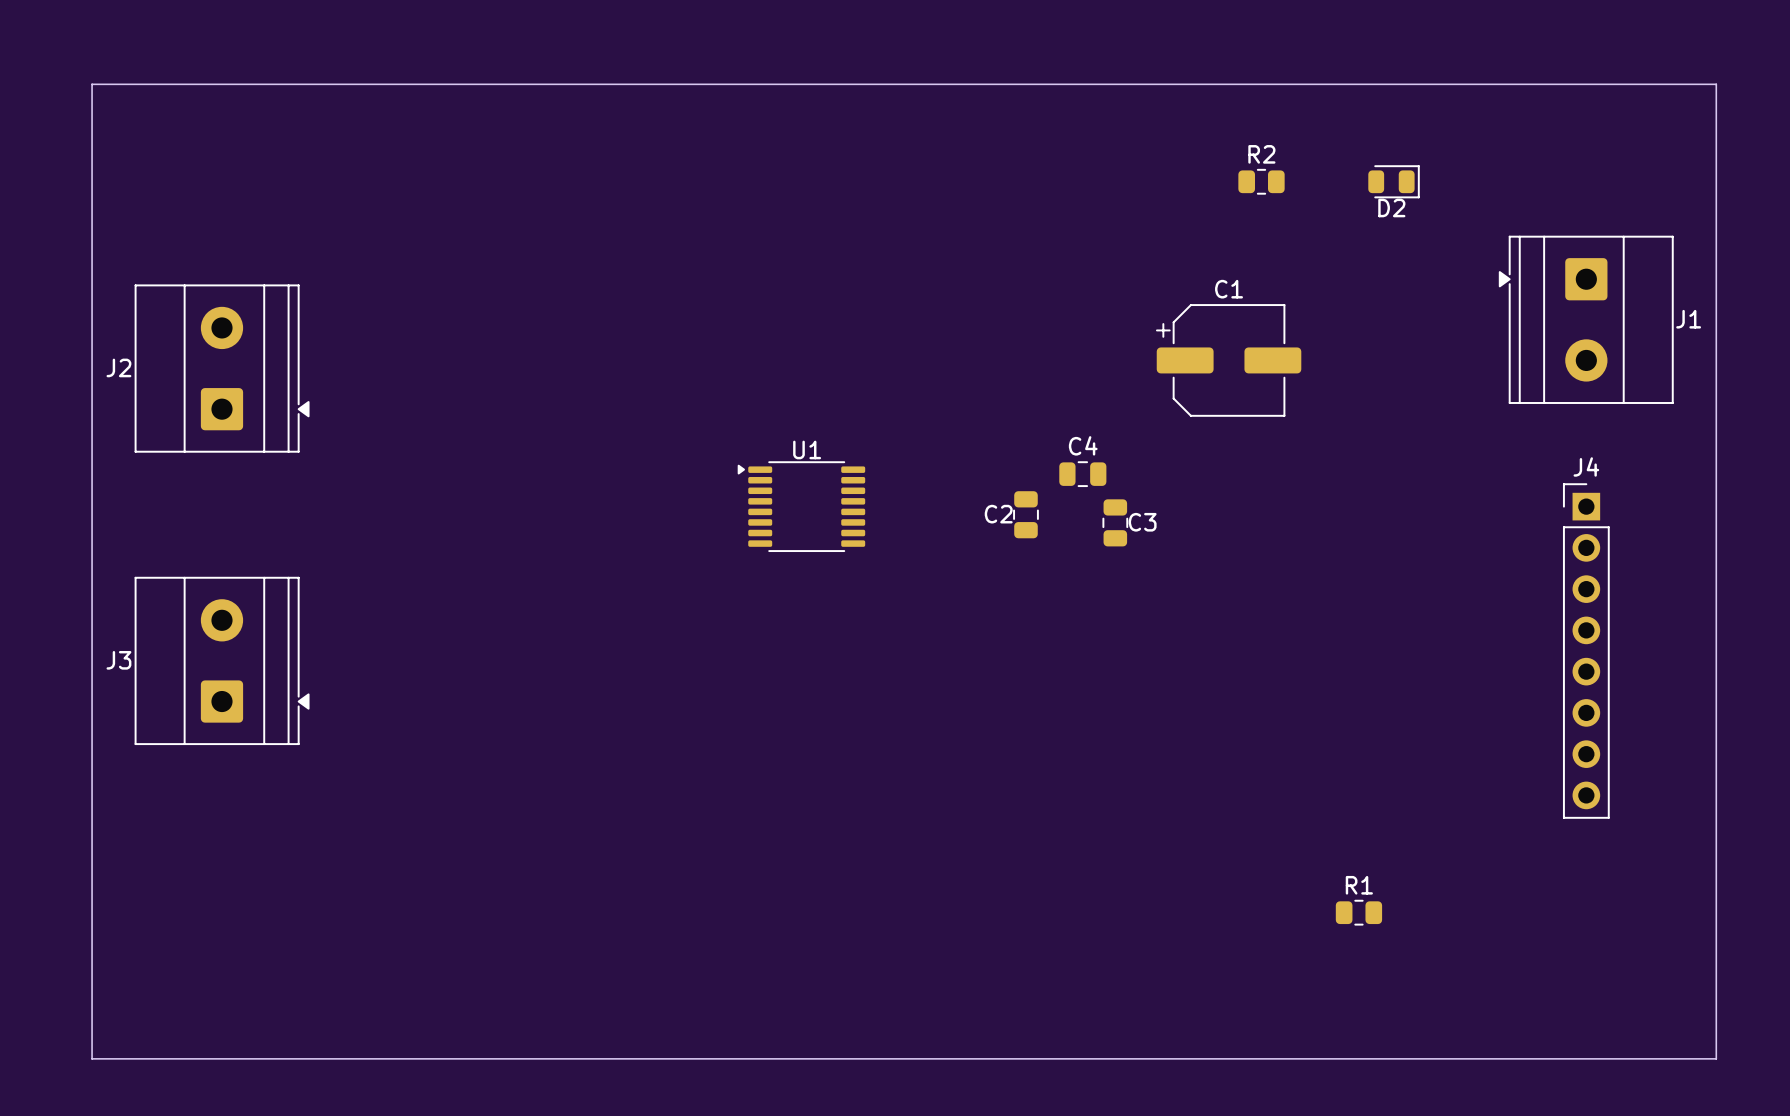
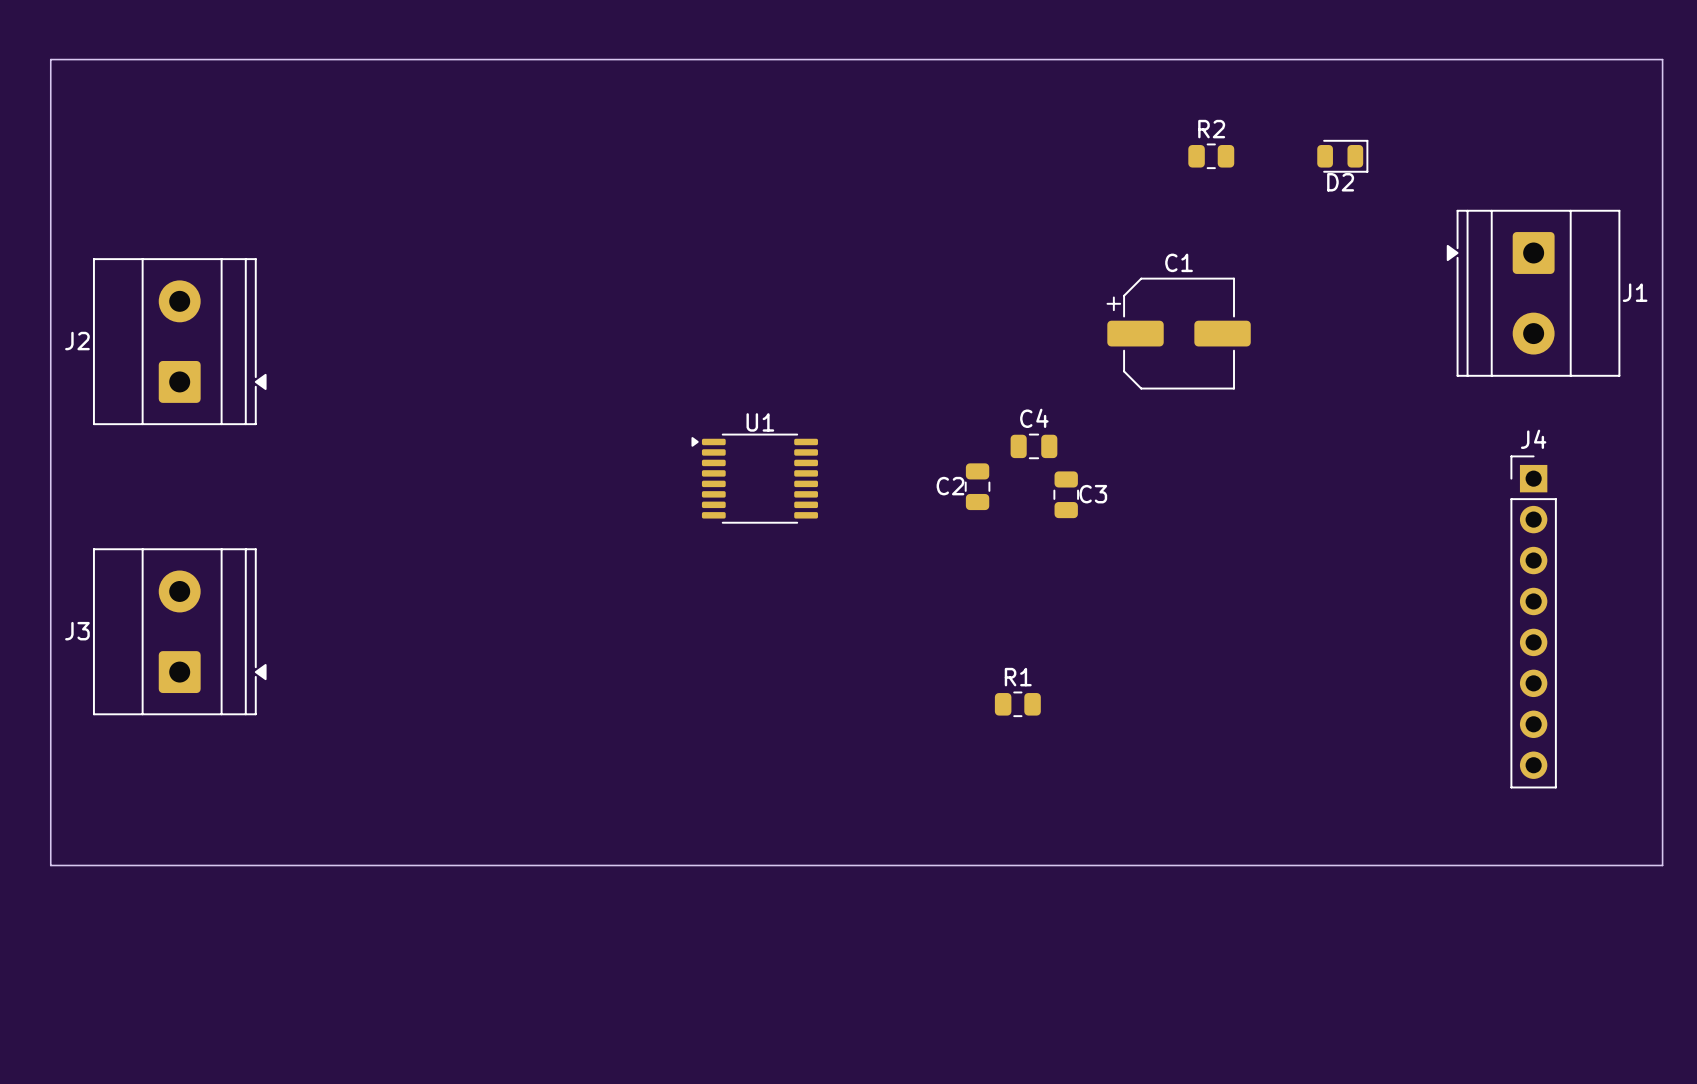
board edge: (92, 896) (92, 1058) (1716, 1058) (1716, 896) -> (50, 865) (1662, 865)
R1 position: (1358, 912) -> (1017, 704)

